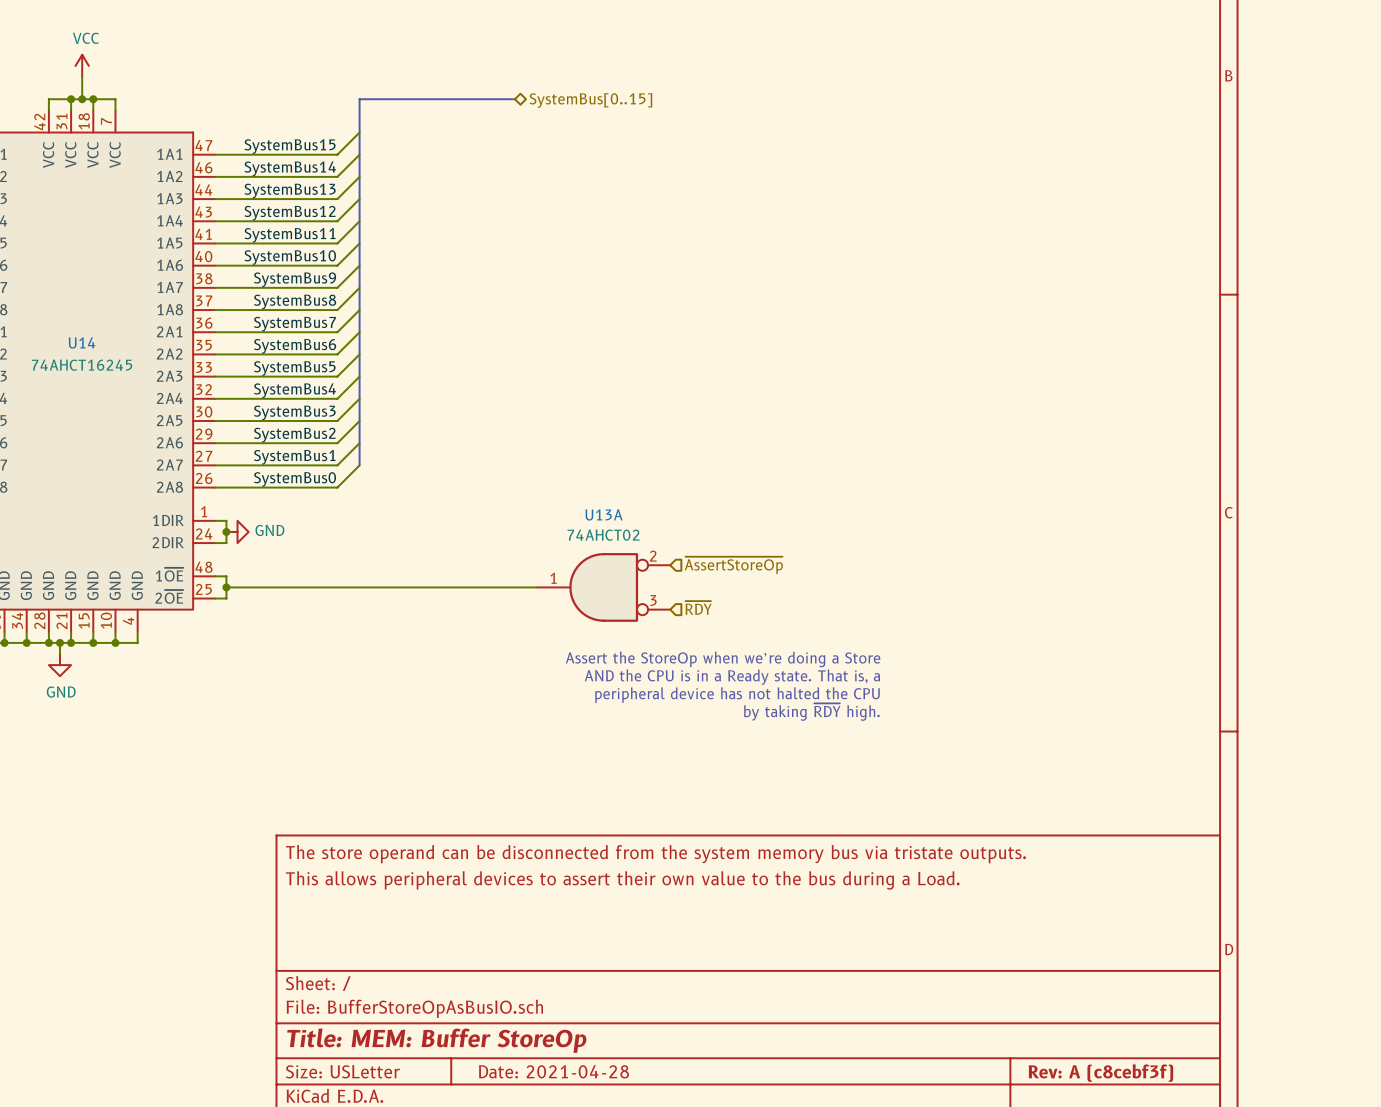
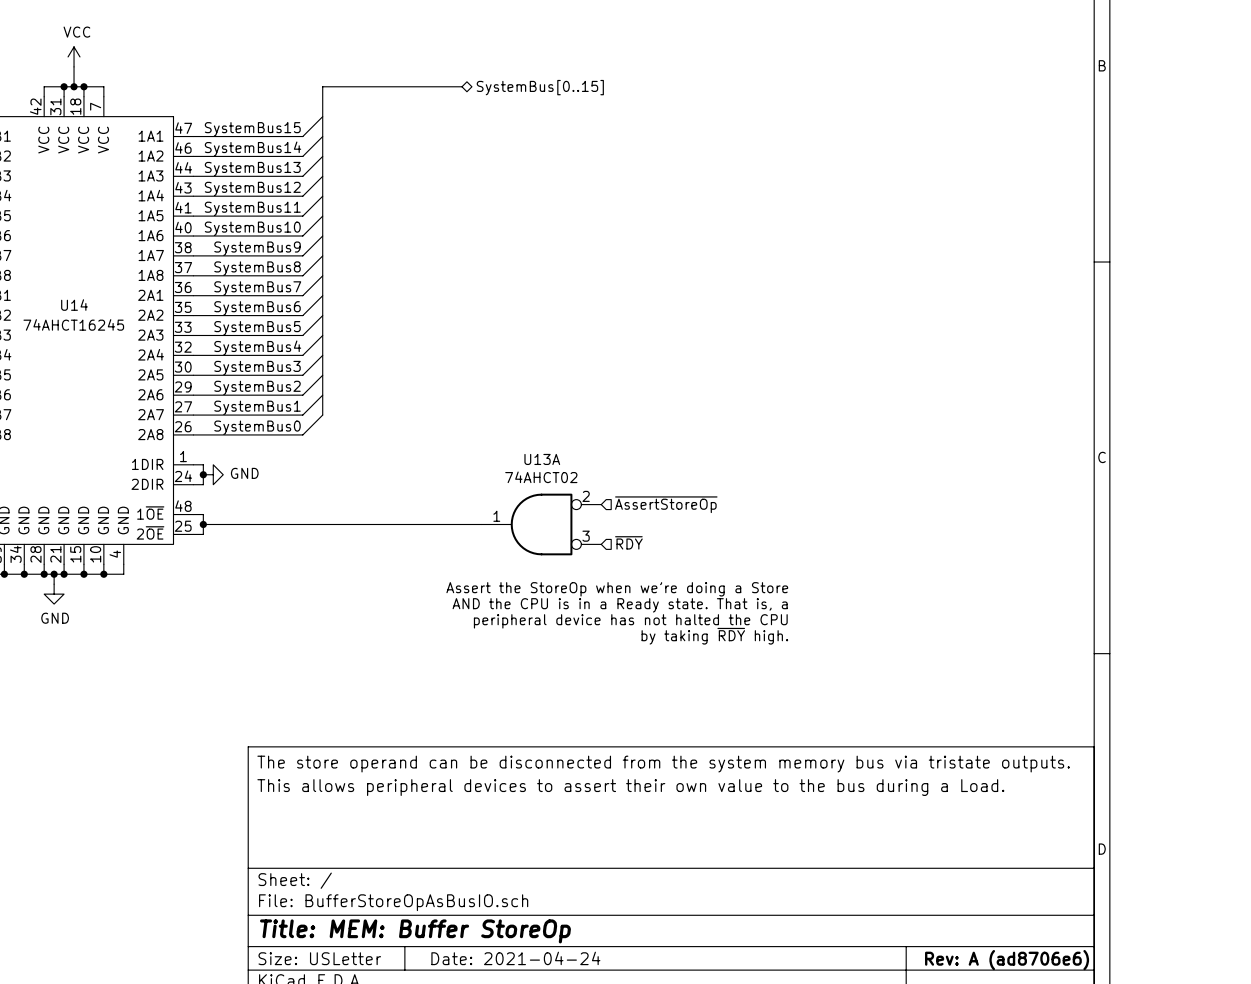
title block: Date: 2021-04-28 (553, 1071) -> Date: 2021-04-24 (515, 958)
title block: Rev: A (c8cebf3f) (1100, 1073) -> Rev: A (ad8706e6) (1007, 960)

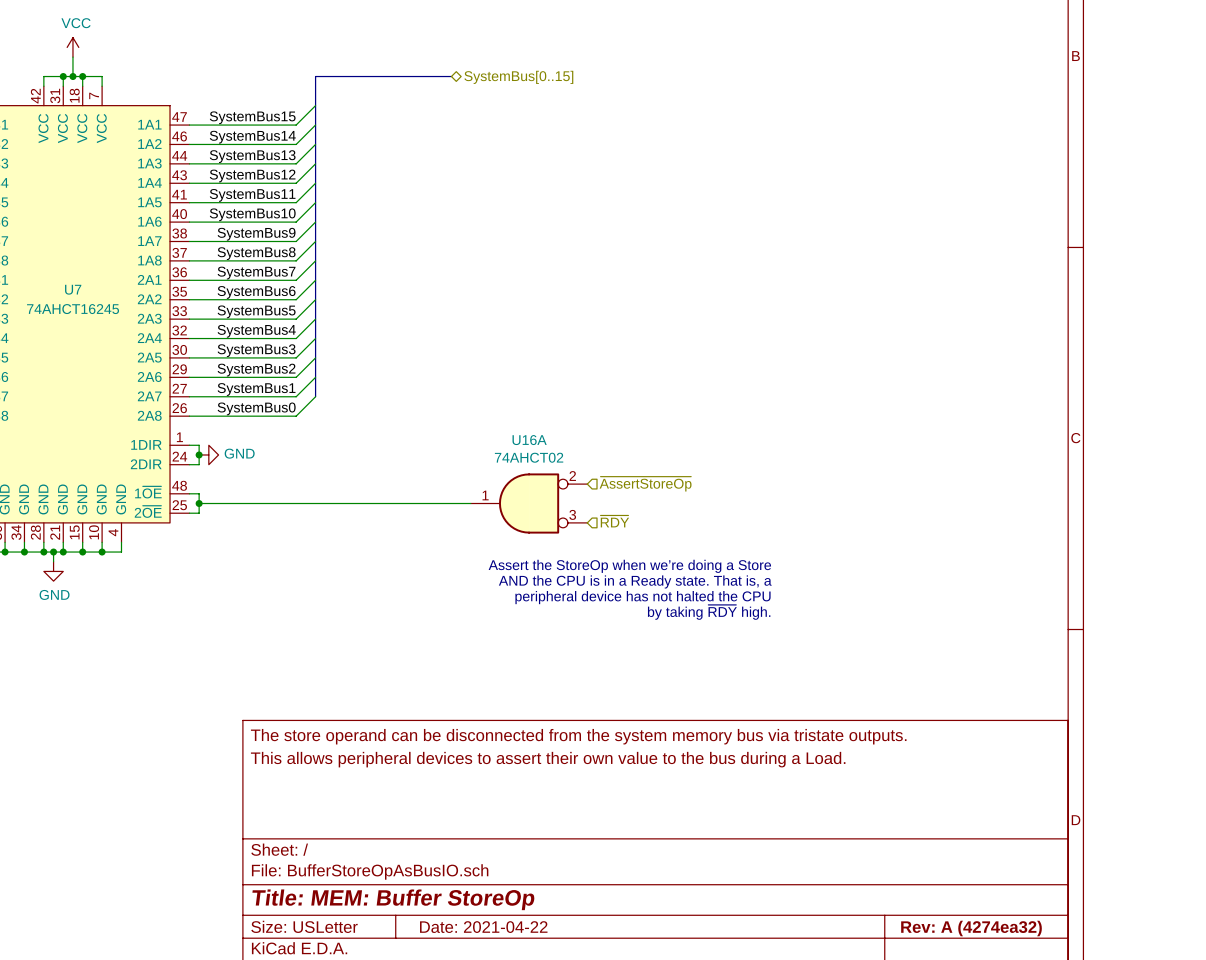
U14 name: U14 (74, 305) -> U7 (73, 289)
U13A name: U13A (542, 459) -> U16A (529, 440)
title block: Date: 2021-04-24 (515, 958) -> Date: 2021-04-22 (483, 927)
title block: Rev: A (ad8706e6) (1007, 960) -> Rev: A (4274ea32) (971, 928)

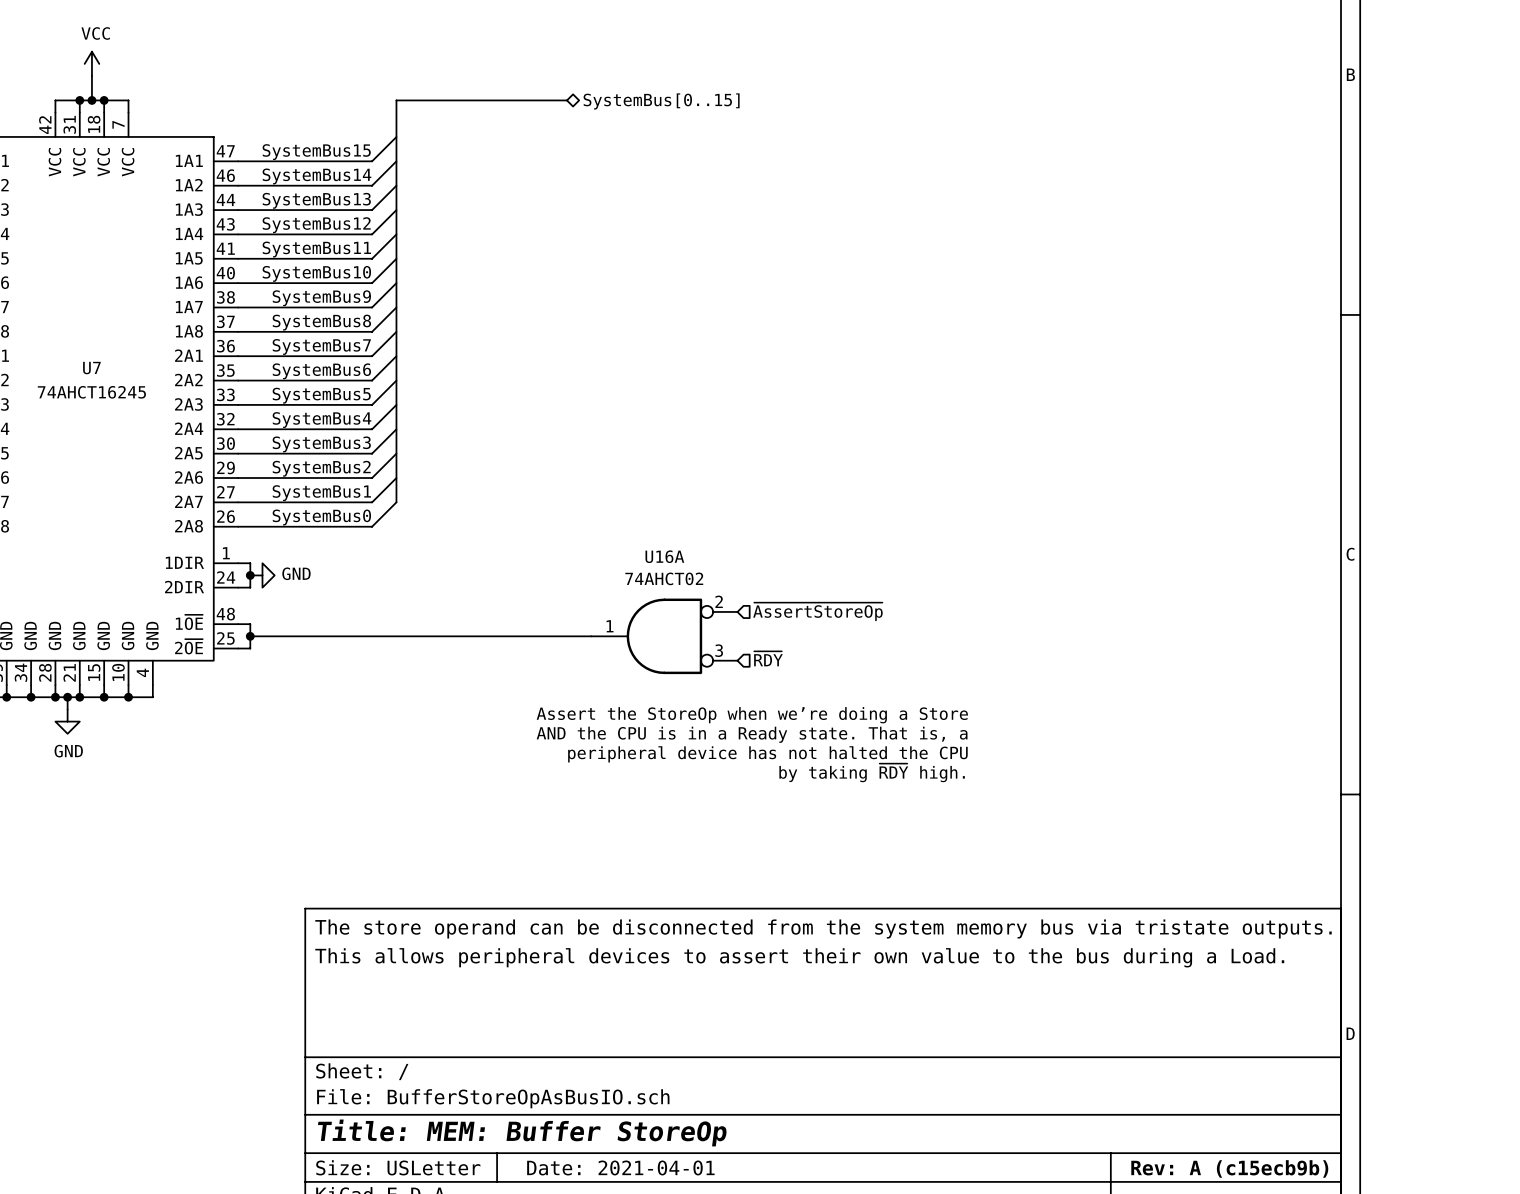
title block: Date: 2021-04-22 (483, 927) -> Date: 2021-04-01 (620, 1167)
title block: Rev: A (4274ea32) (971, 928) -> Rev: A (c15ecb9b) (1229, 1168)

